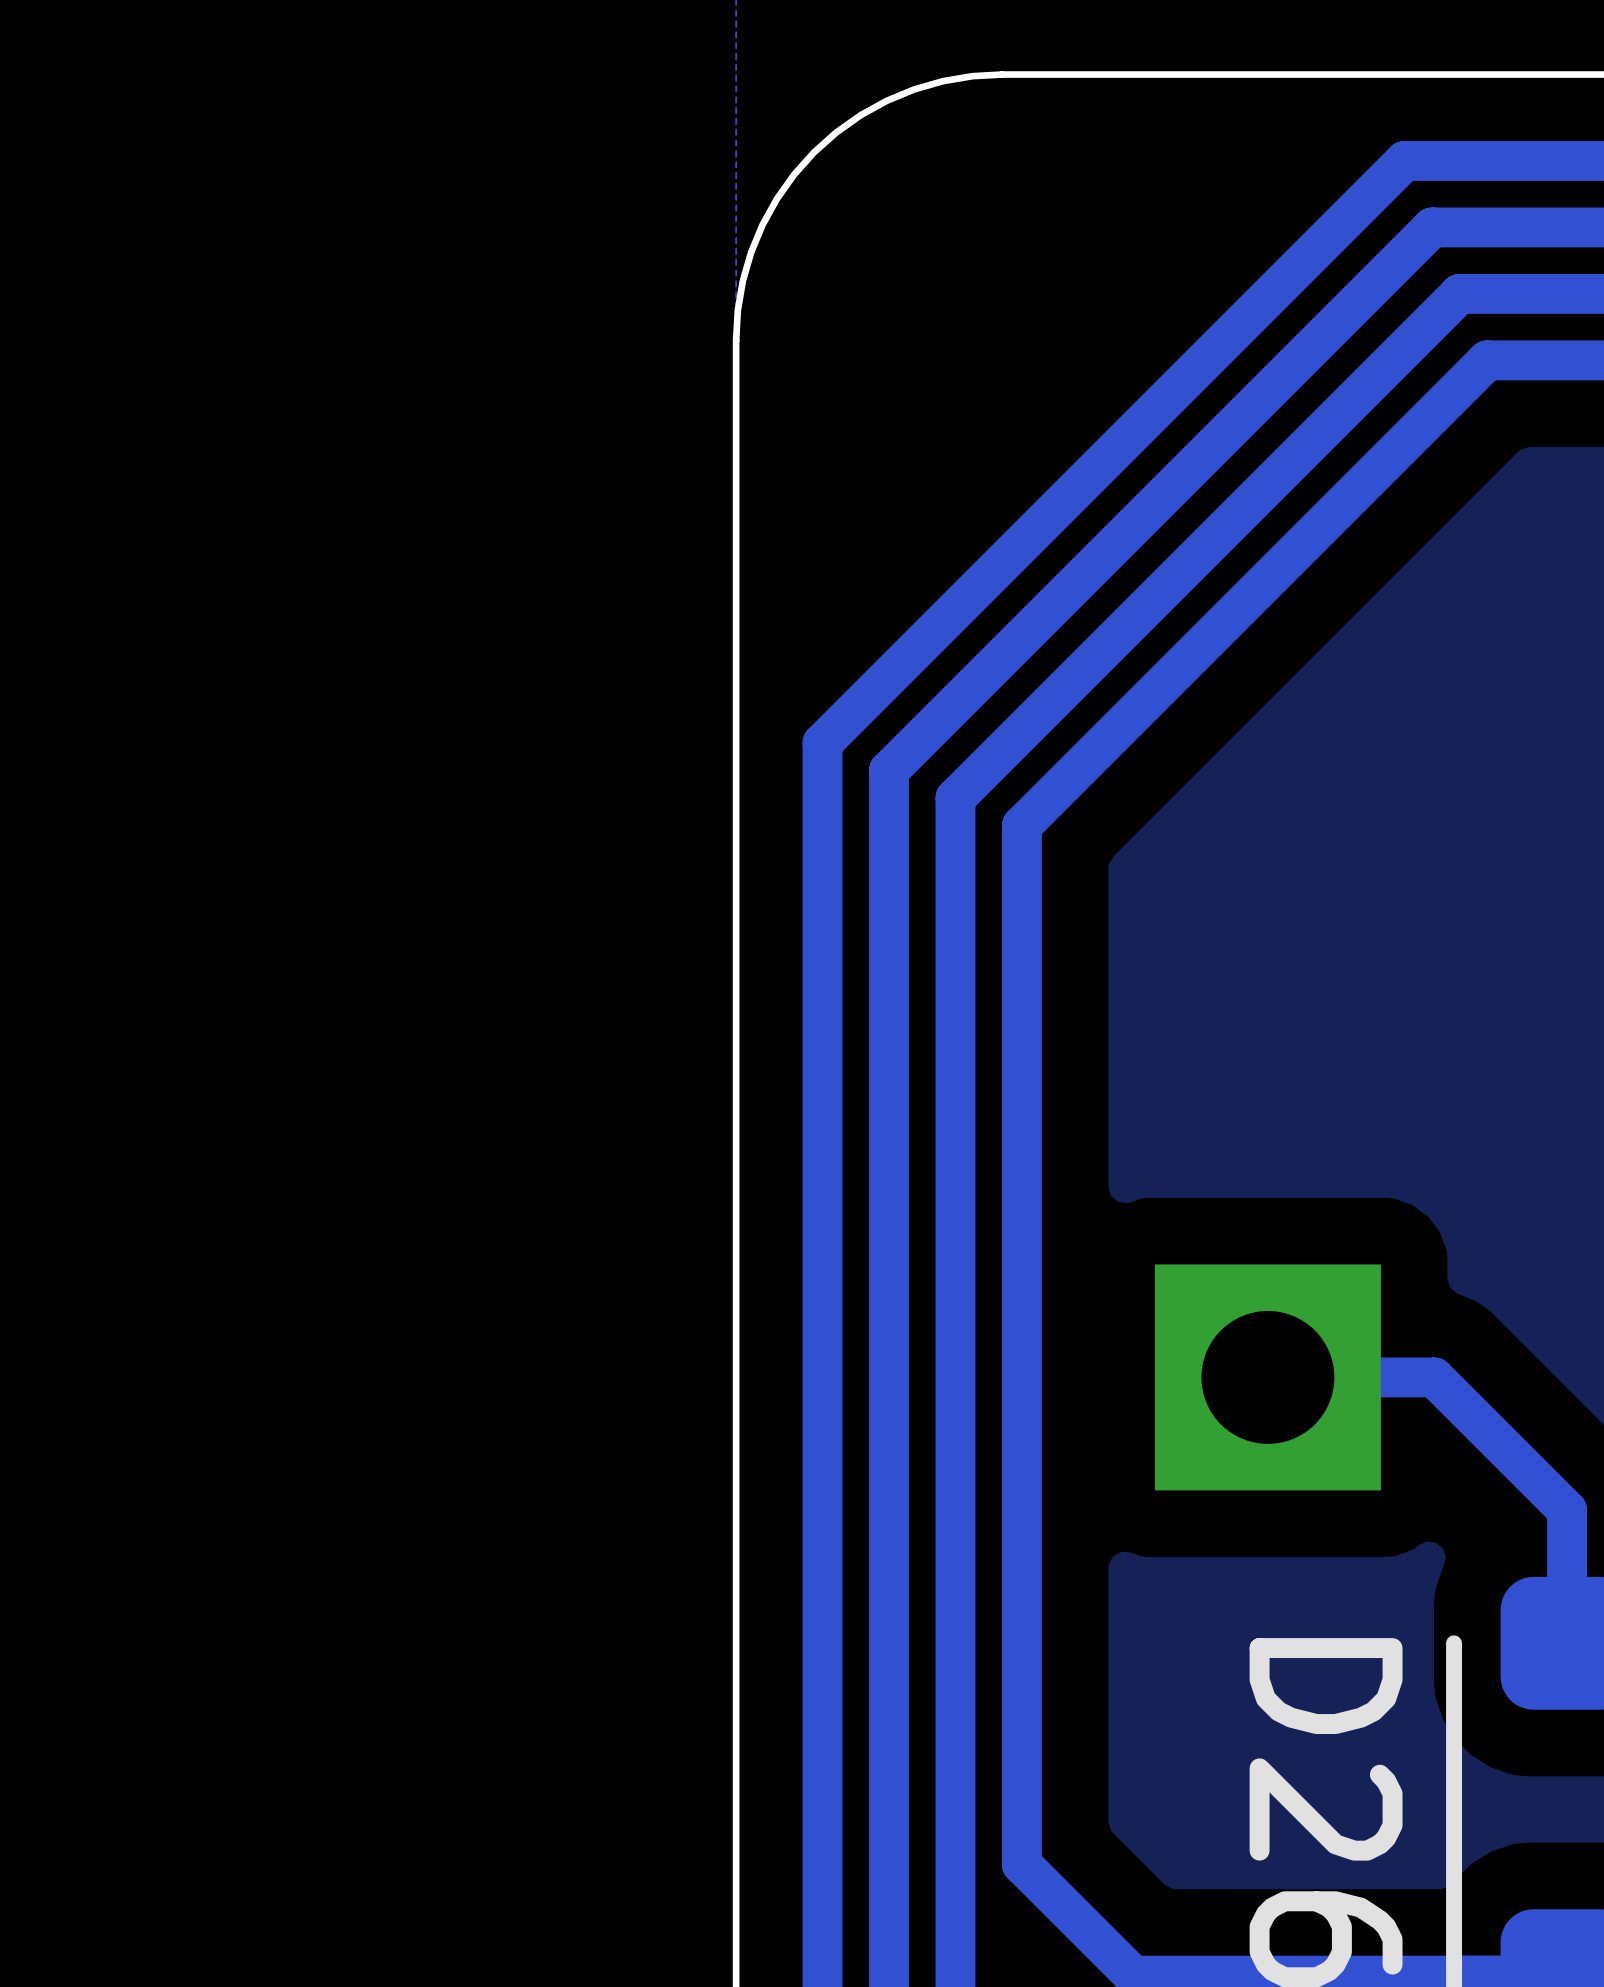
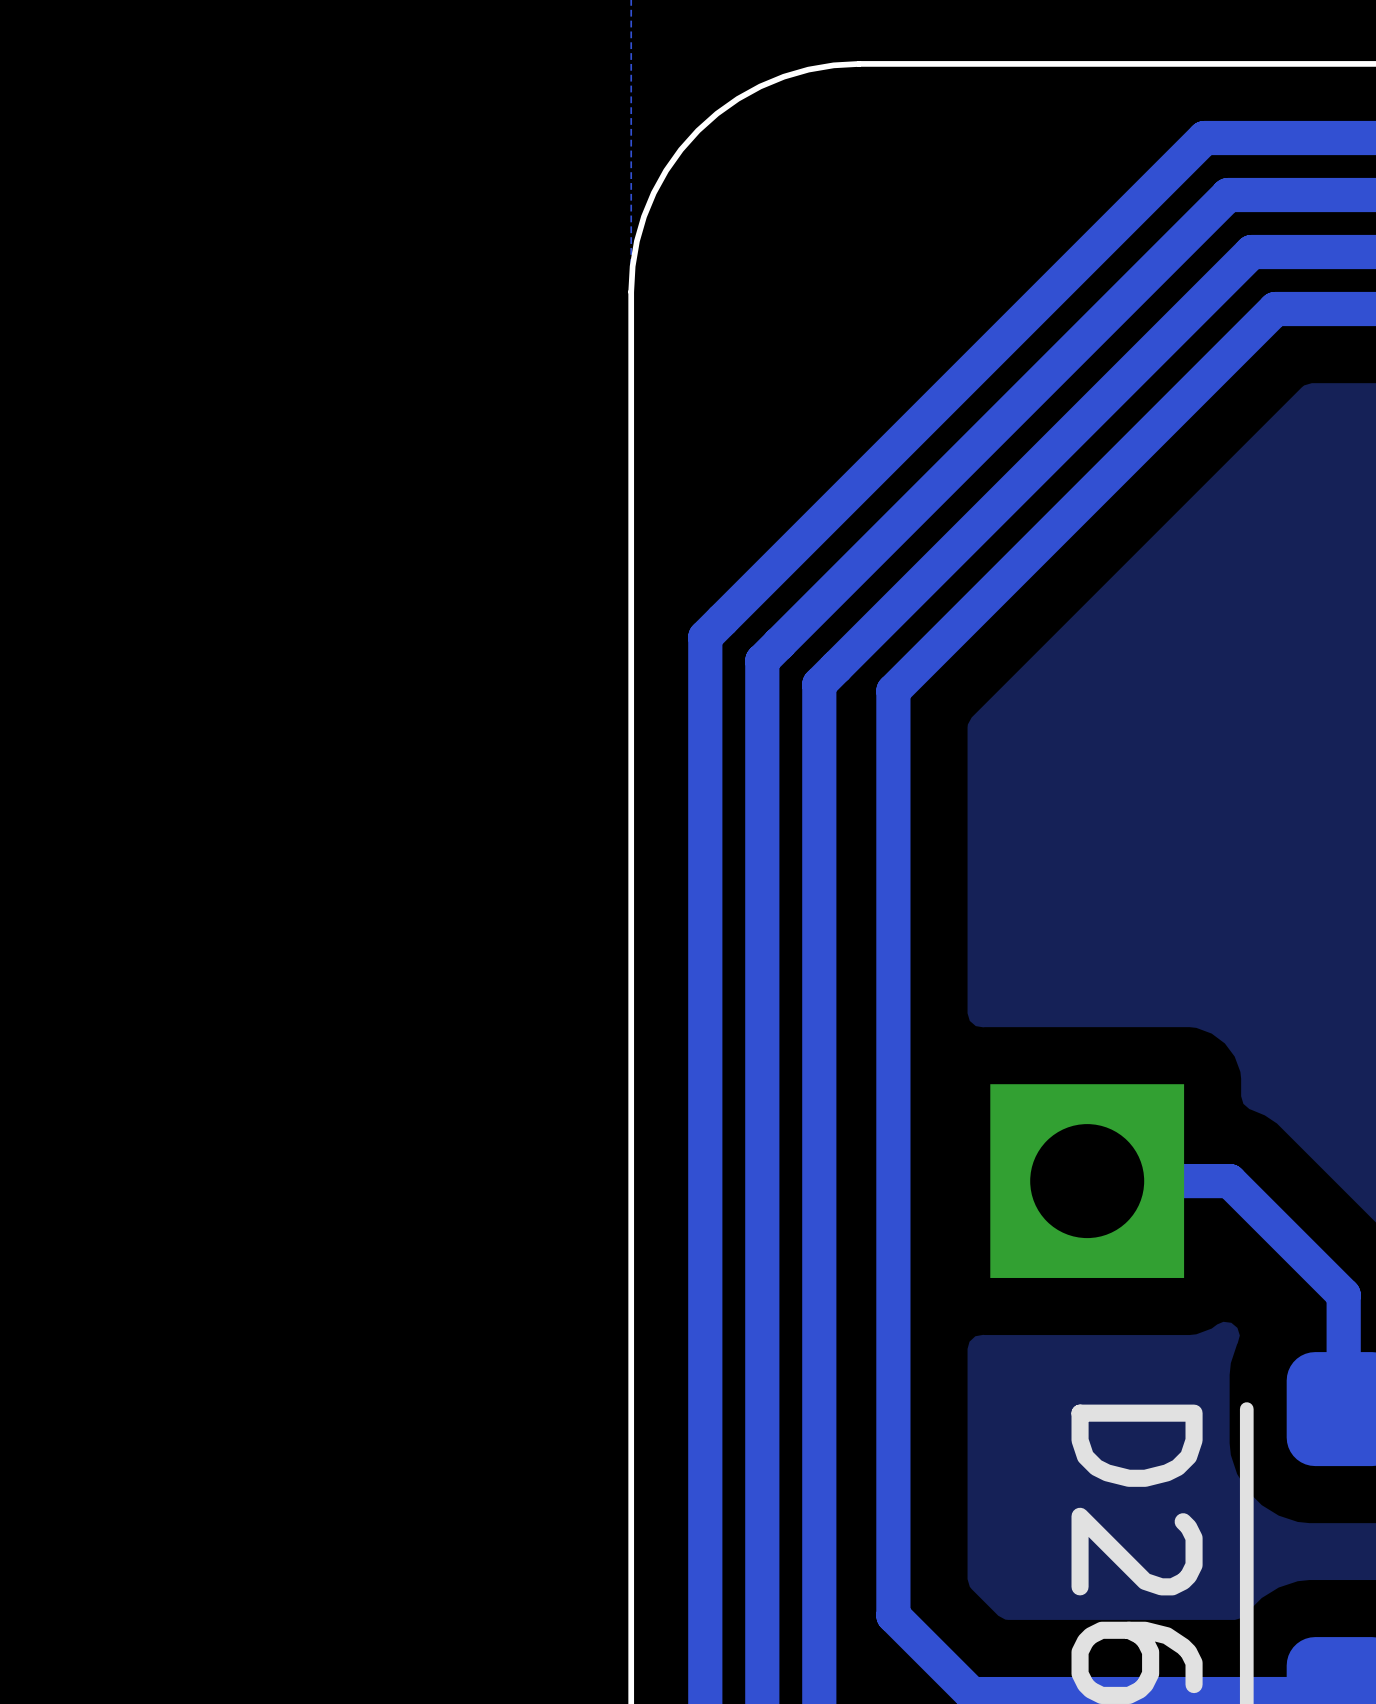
track: (1041, 805) (1021, 825) (1021, 1864) (1041, 1884) -> (893, 690) (893, 1615)

